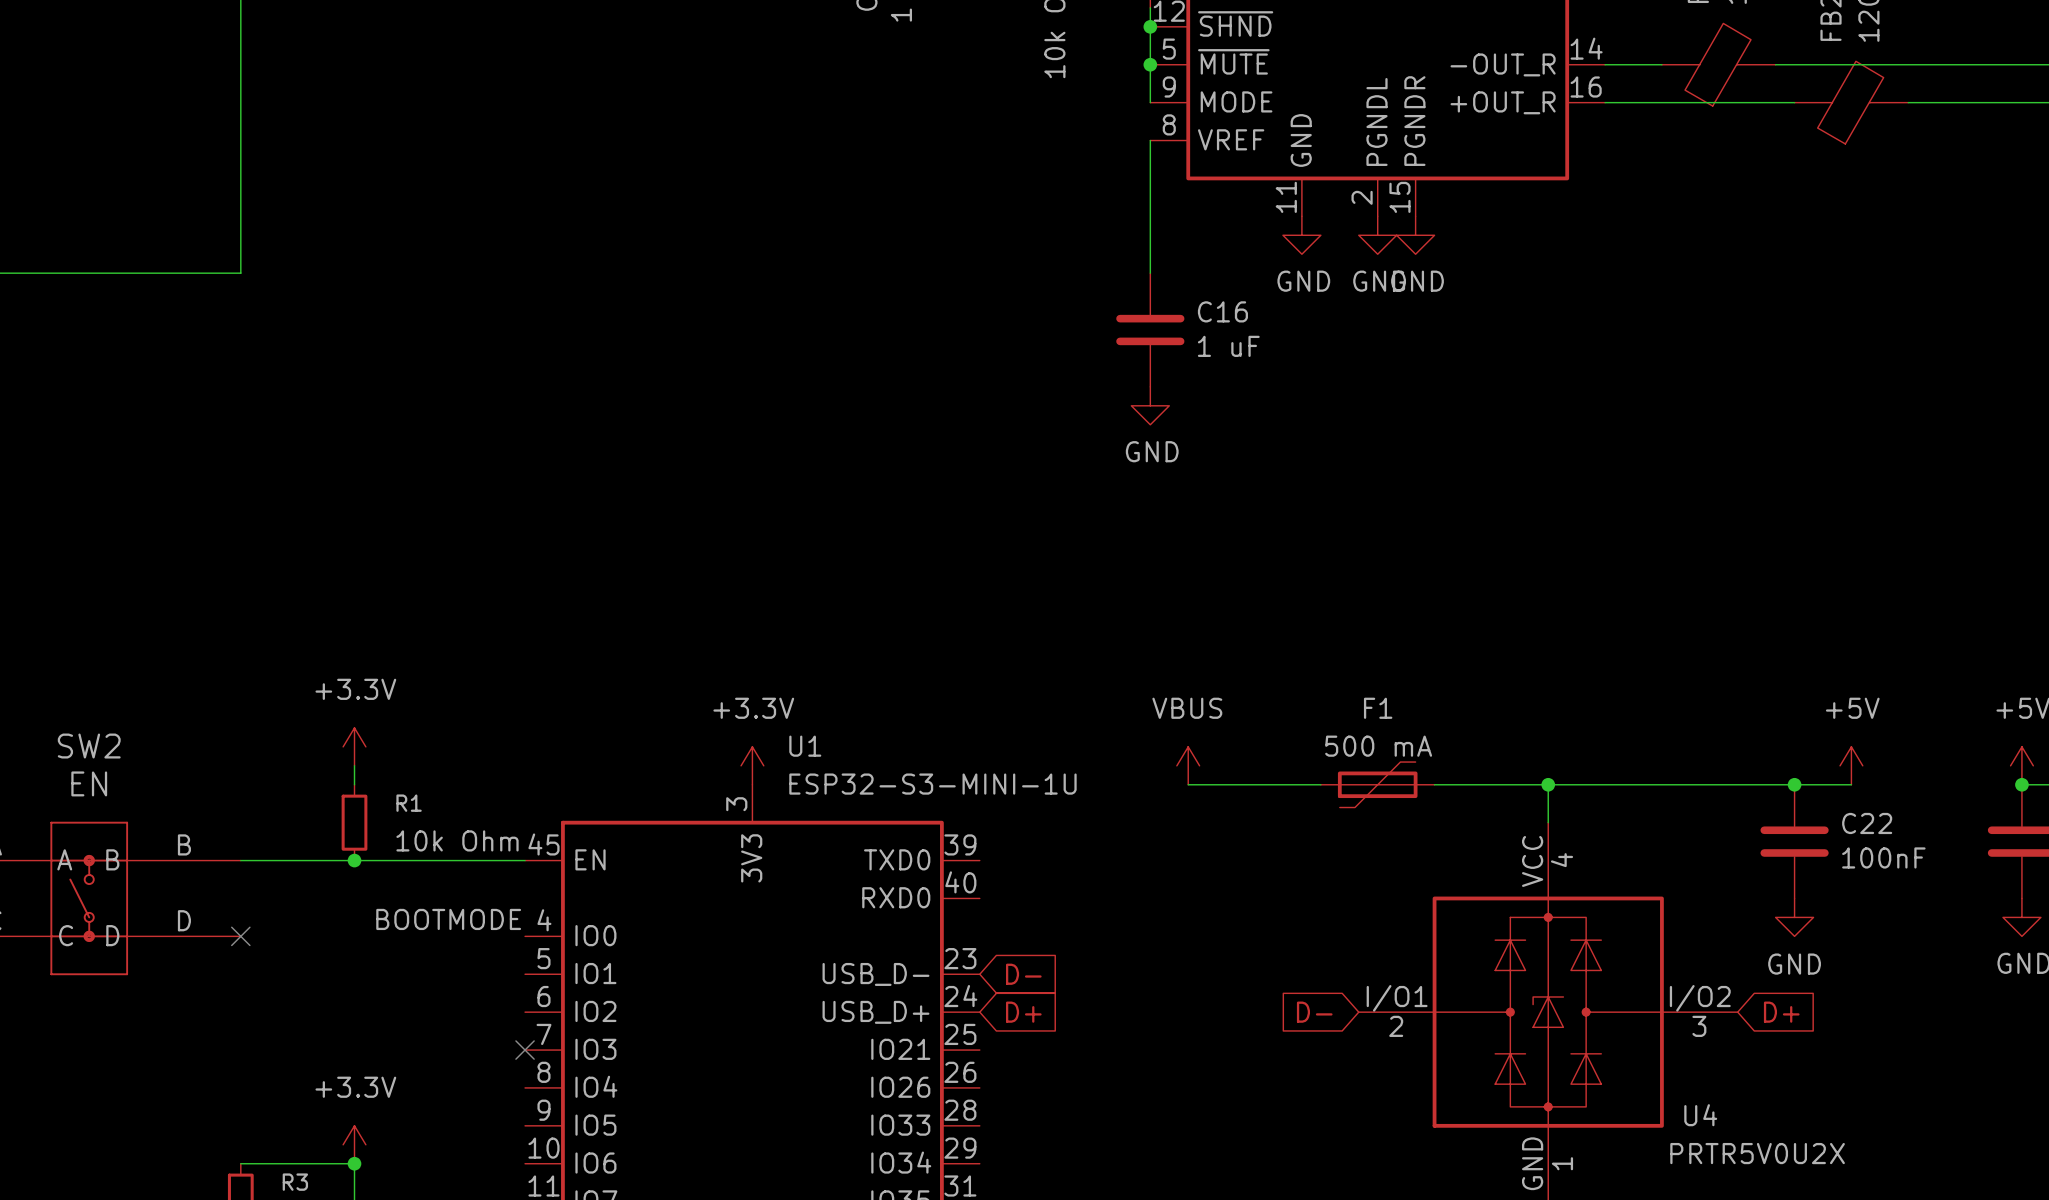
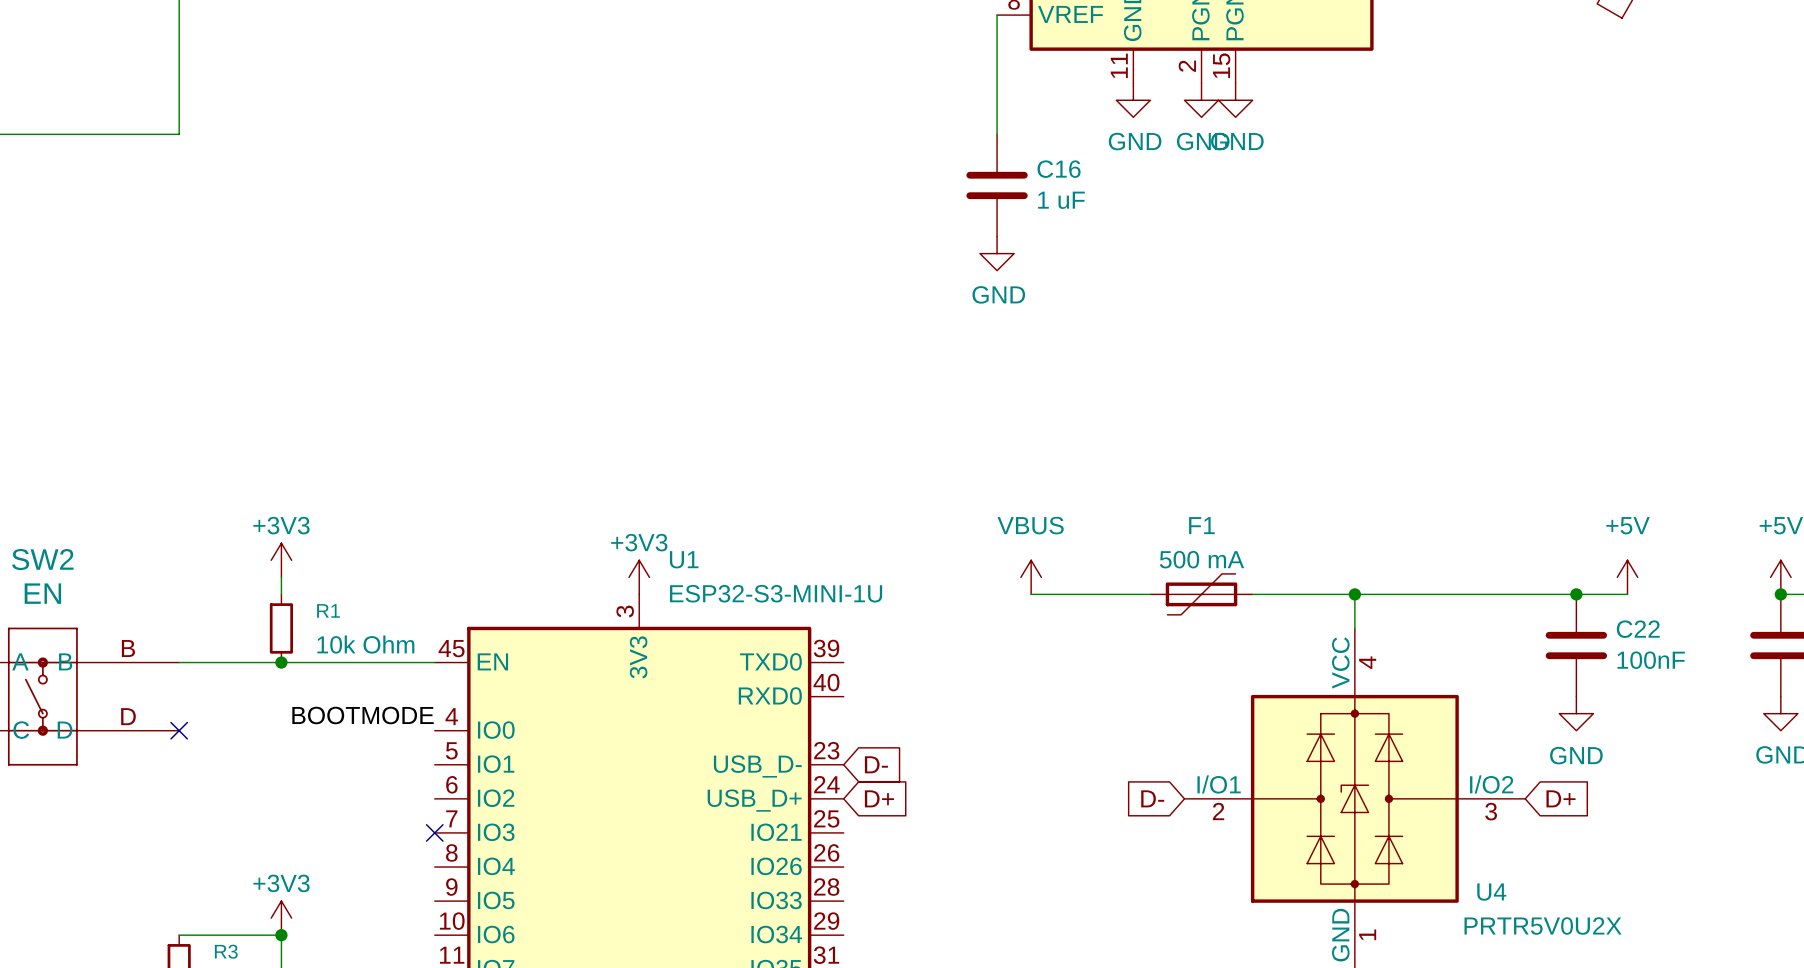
power symbol: +3.3V (354, 746) -> +3V3 (281, 560)
power symbol: +3.3V (752, 765) -> +3V3 (639, 577)
power symbol: +3.3V (354, 1144) -> +3V3 (281, 918)

